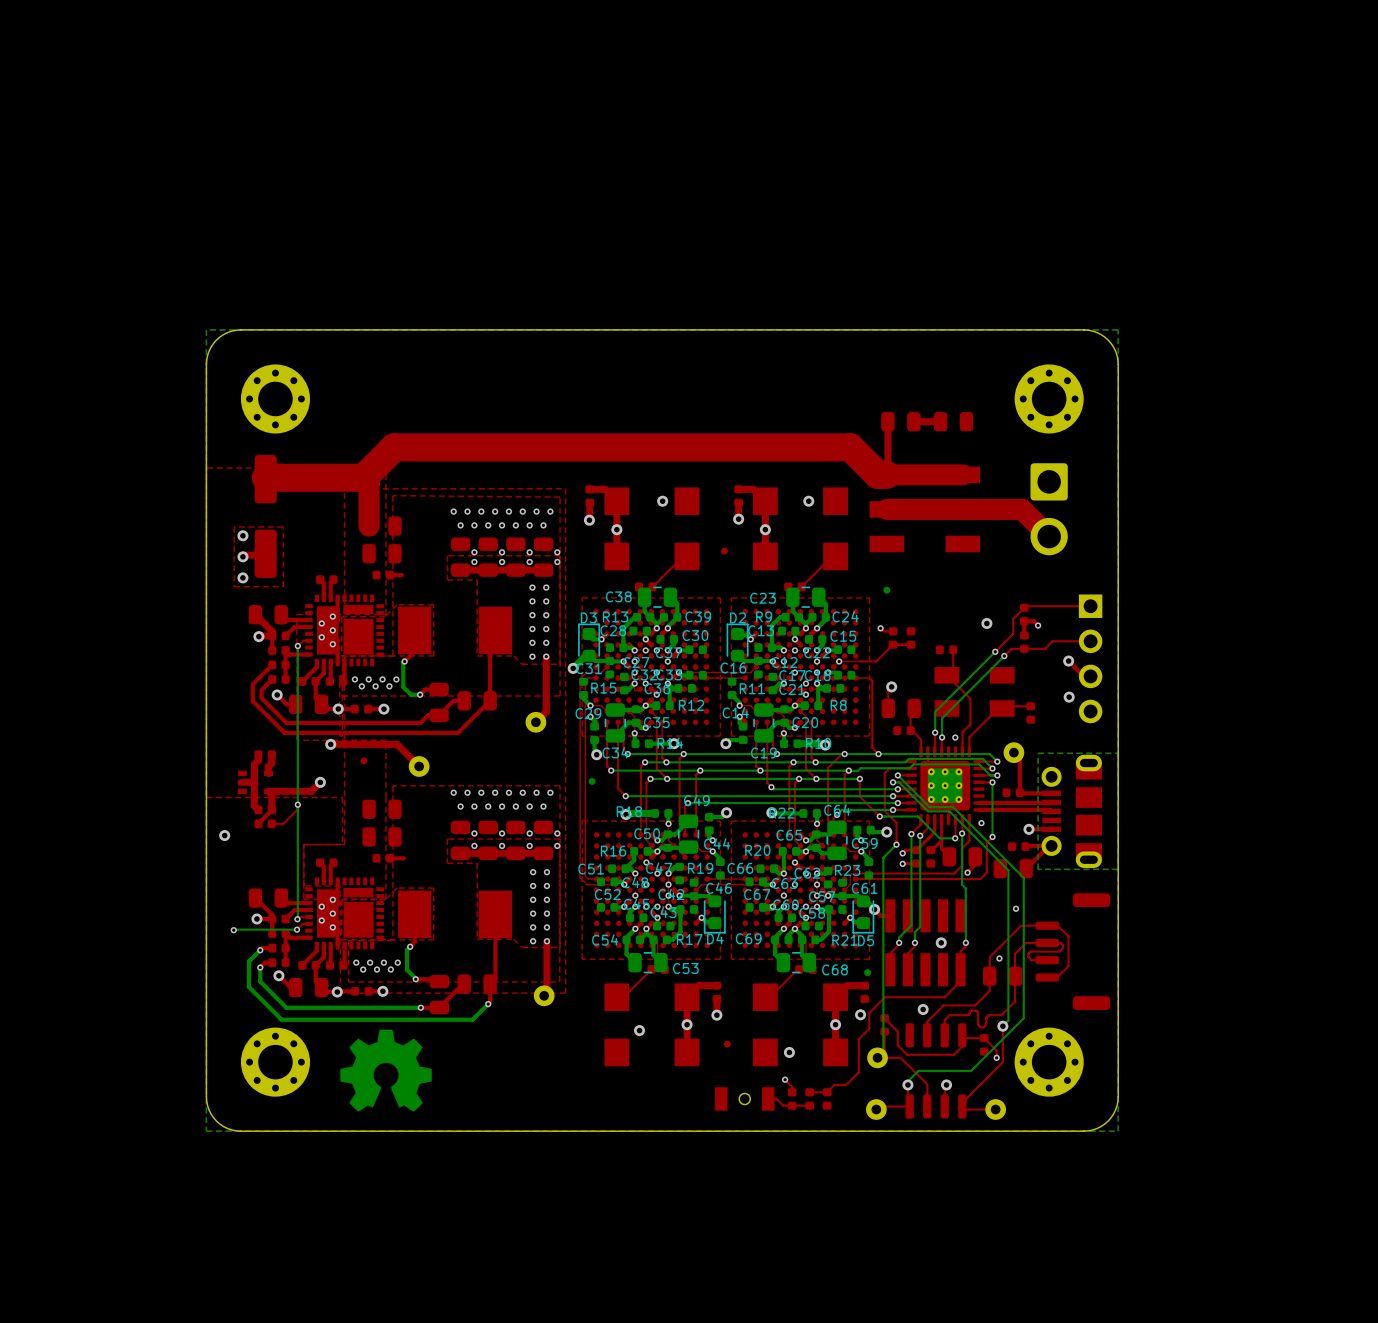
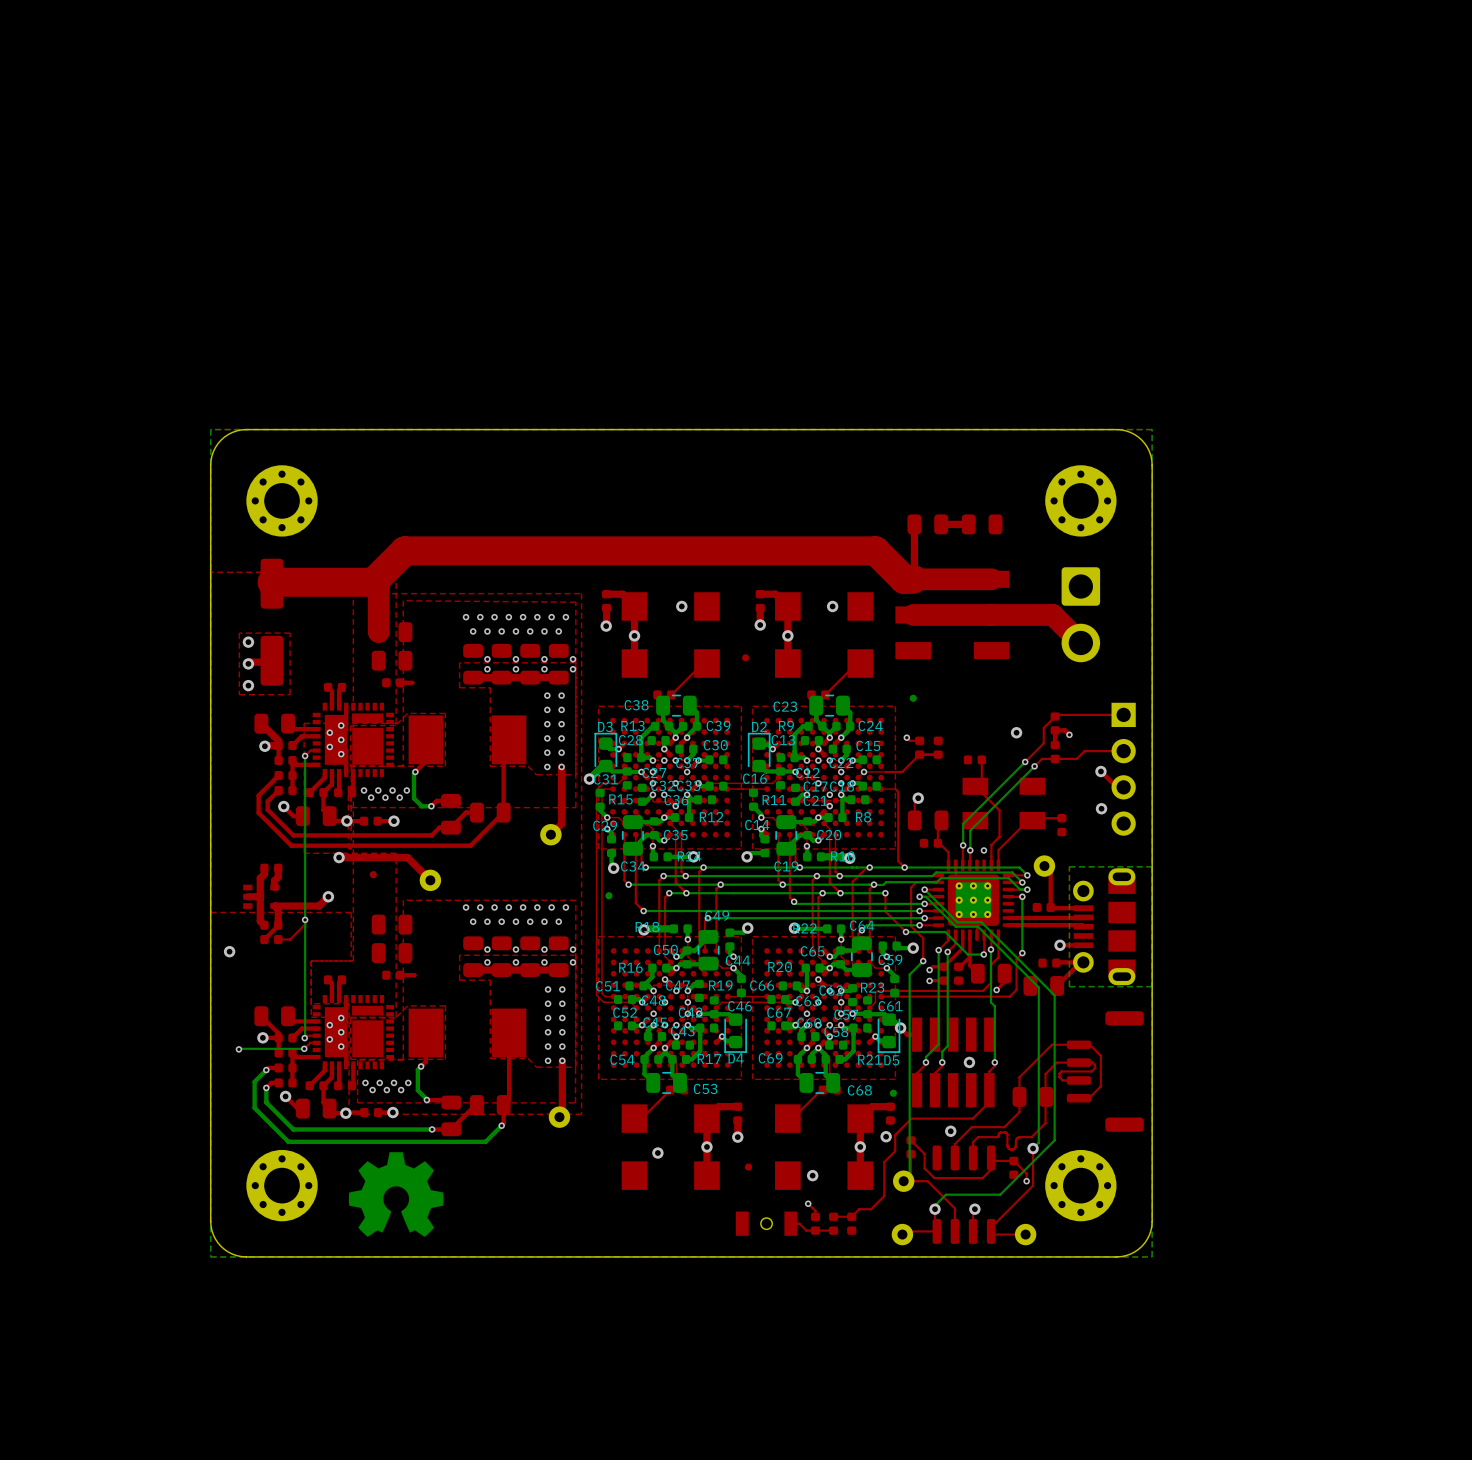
via: (981, 823) -> none
via: (1015, 908) -> none
via: (999, 958) -> none

